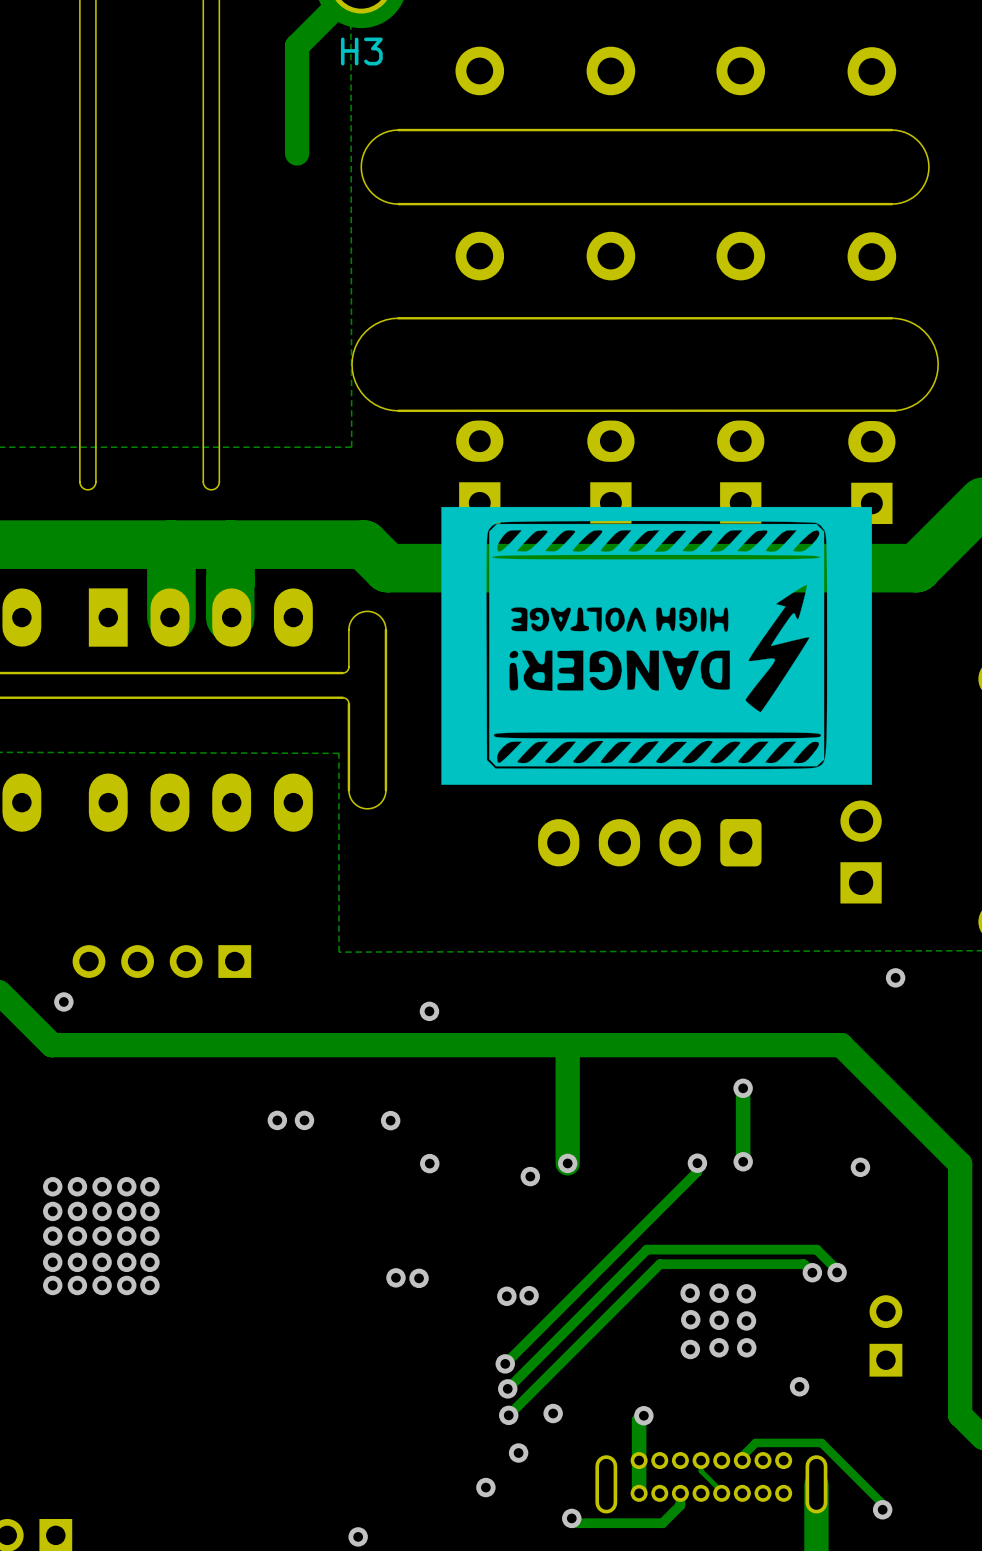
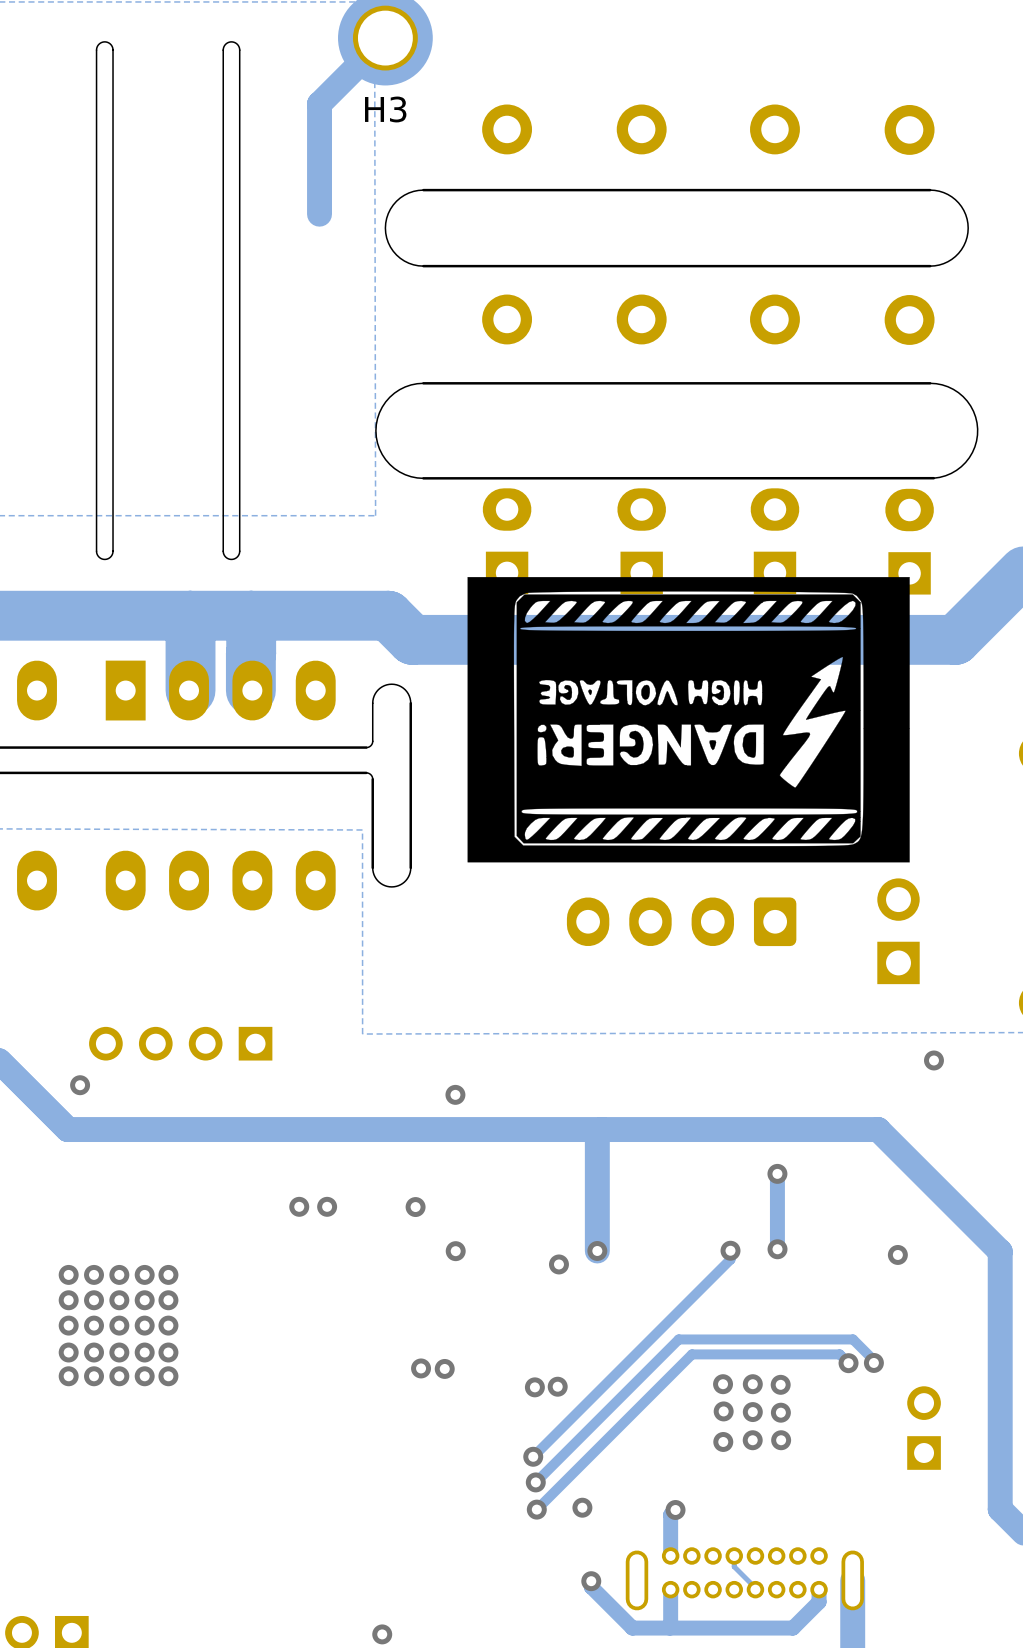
via: (799, 1386) -> none
via: (518, 1453) -> none
track: (639, 1460) (639, 1493) -> (670, 1627) (670, 1589)
track: (742, 1460) (742, 1456) (755, 1442) (821, 1442) (882, 1504) (882, 1509) -> none
track: none -> (591, 1581) (591, 1586) (632, 1628) (792, 1628) (819, 1602) (819, 1589)
via: none -> (591, 1581)
via: (485, 1487) -> none
track: (680, 1493) (680, 1505) (662, 1523) (576, 1523) (571, 1518) -> none
via: (882, 1509) -> none
via: (571, 1518) -> none

